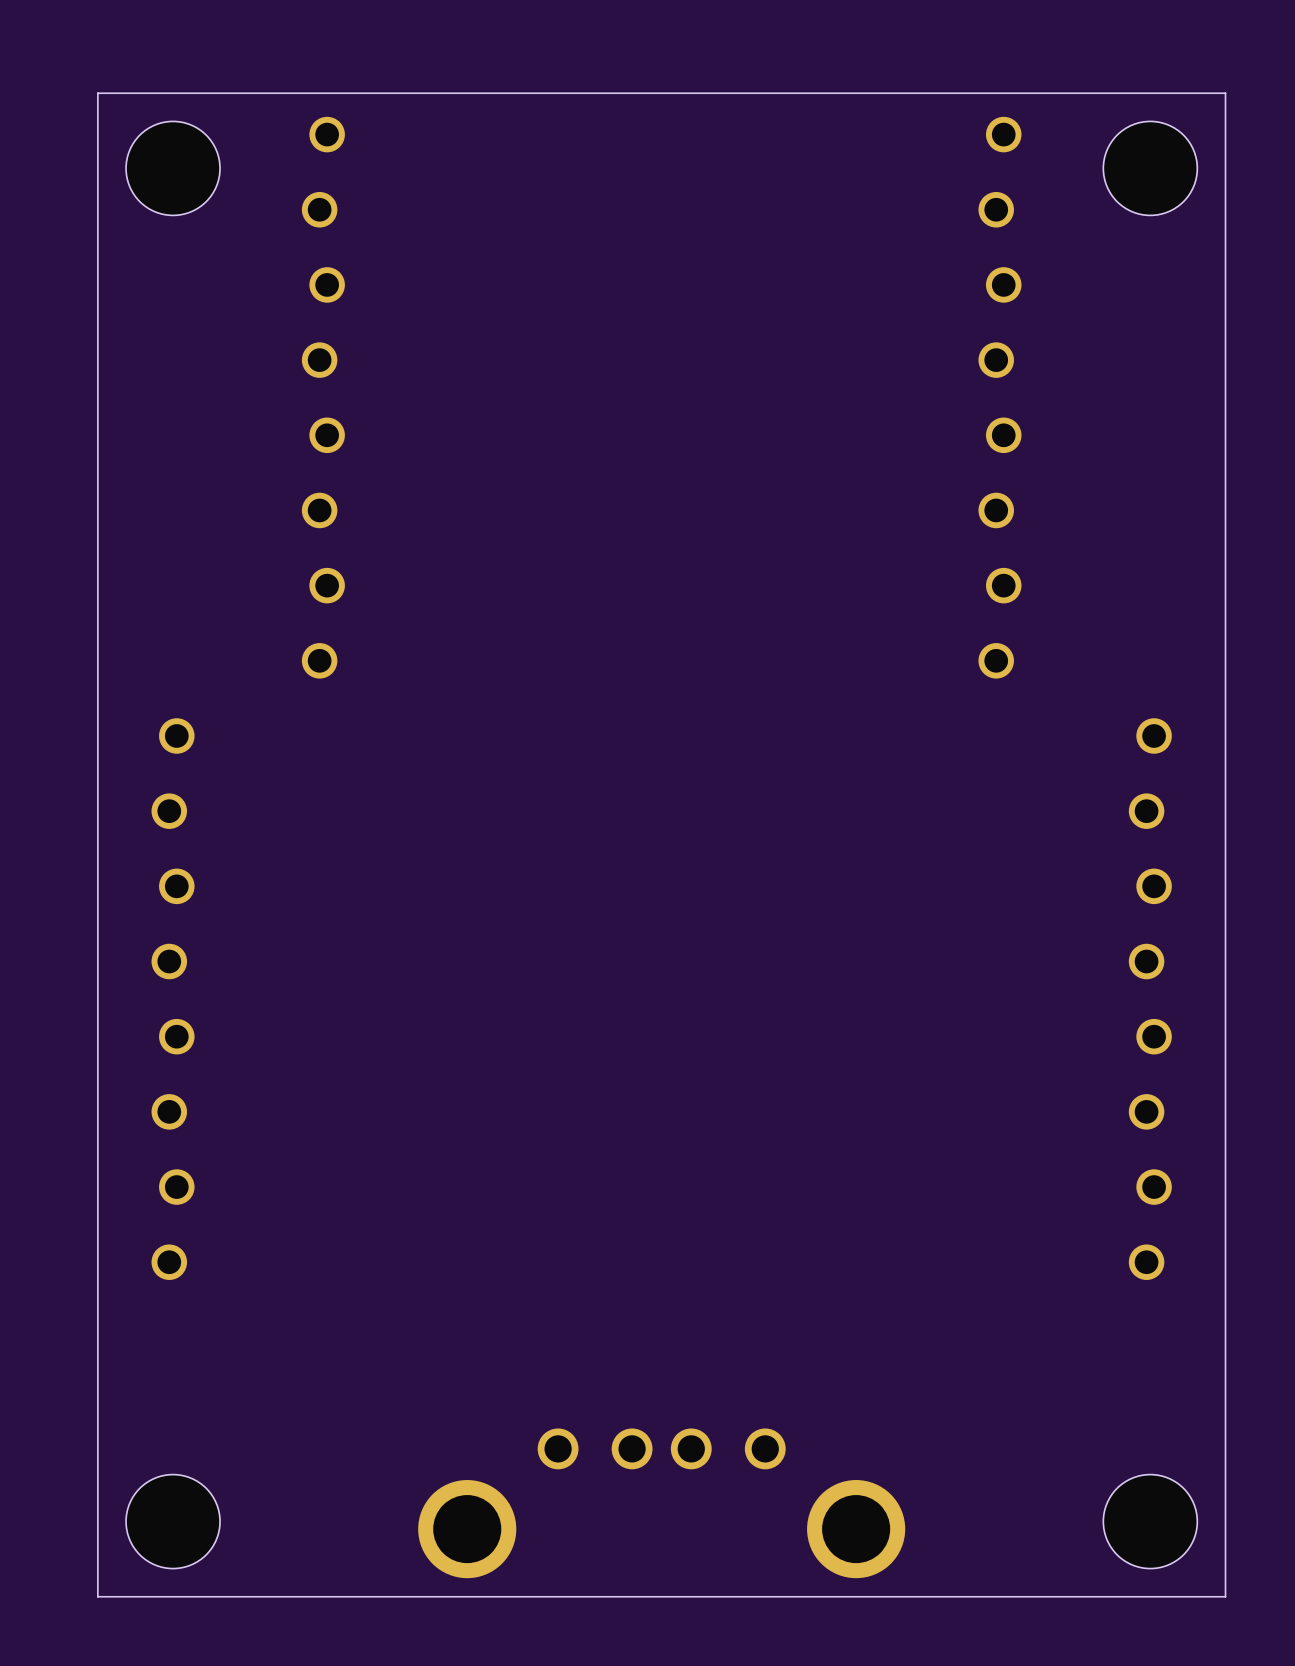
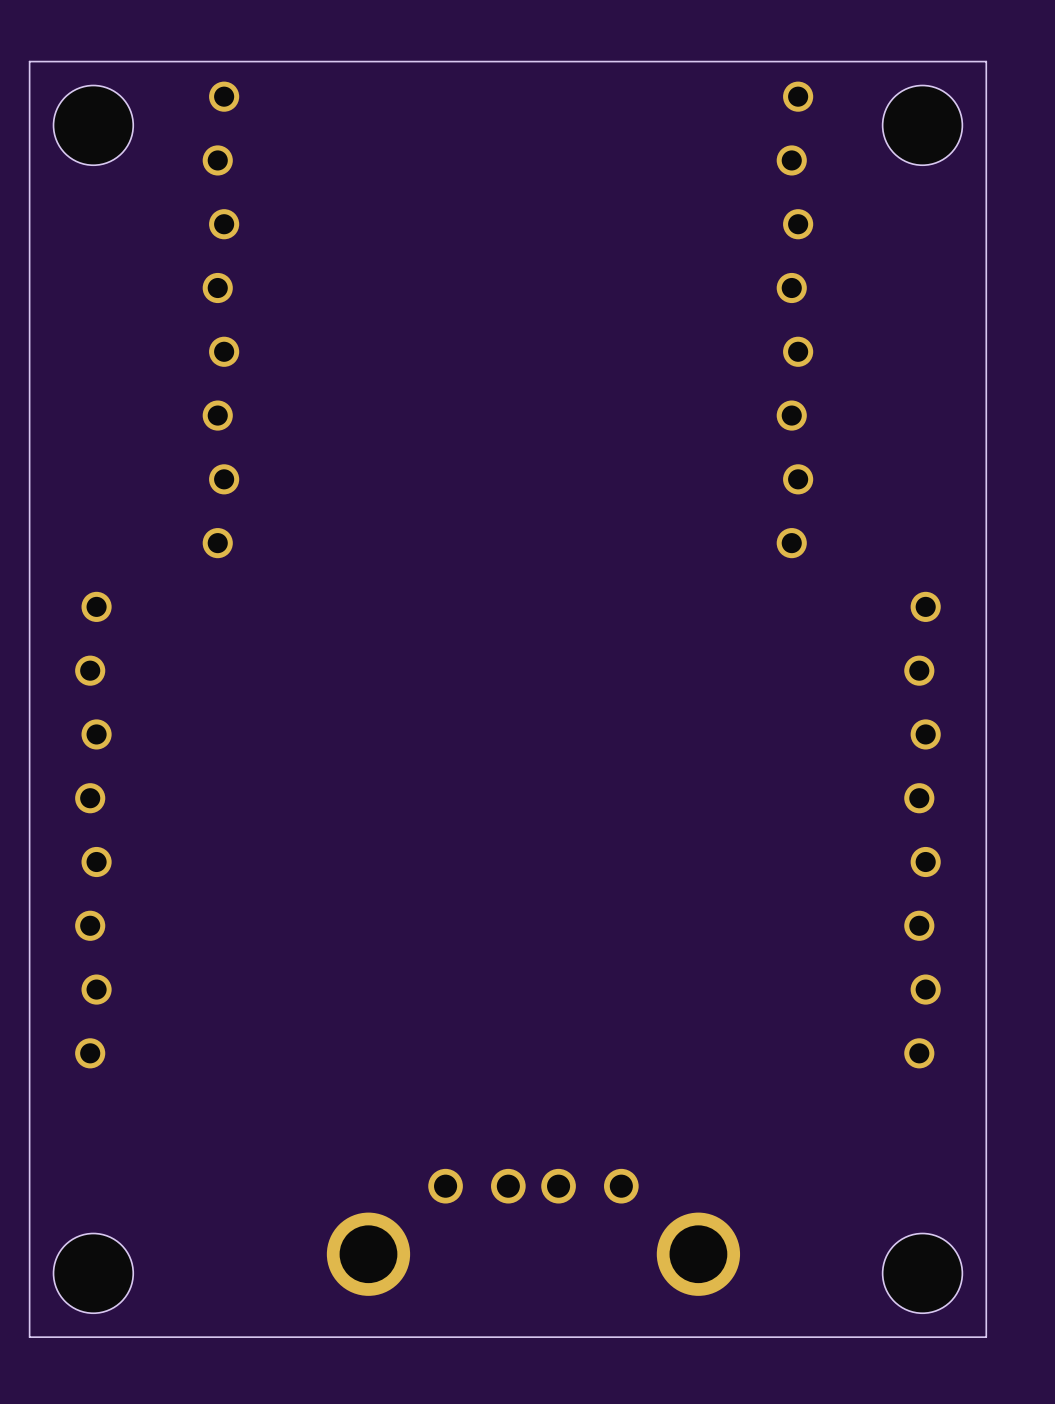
part position: (661, 1503) -> (533, 1232)

